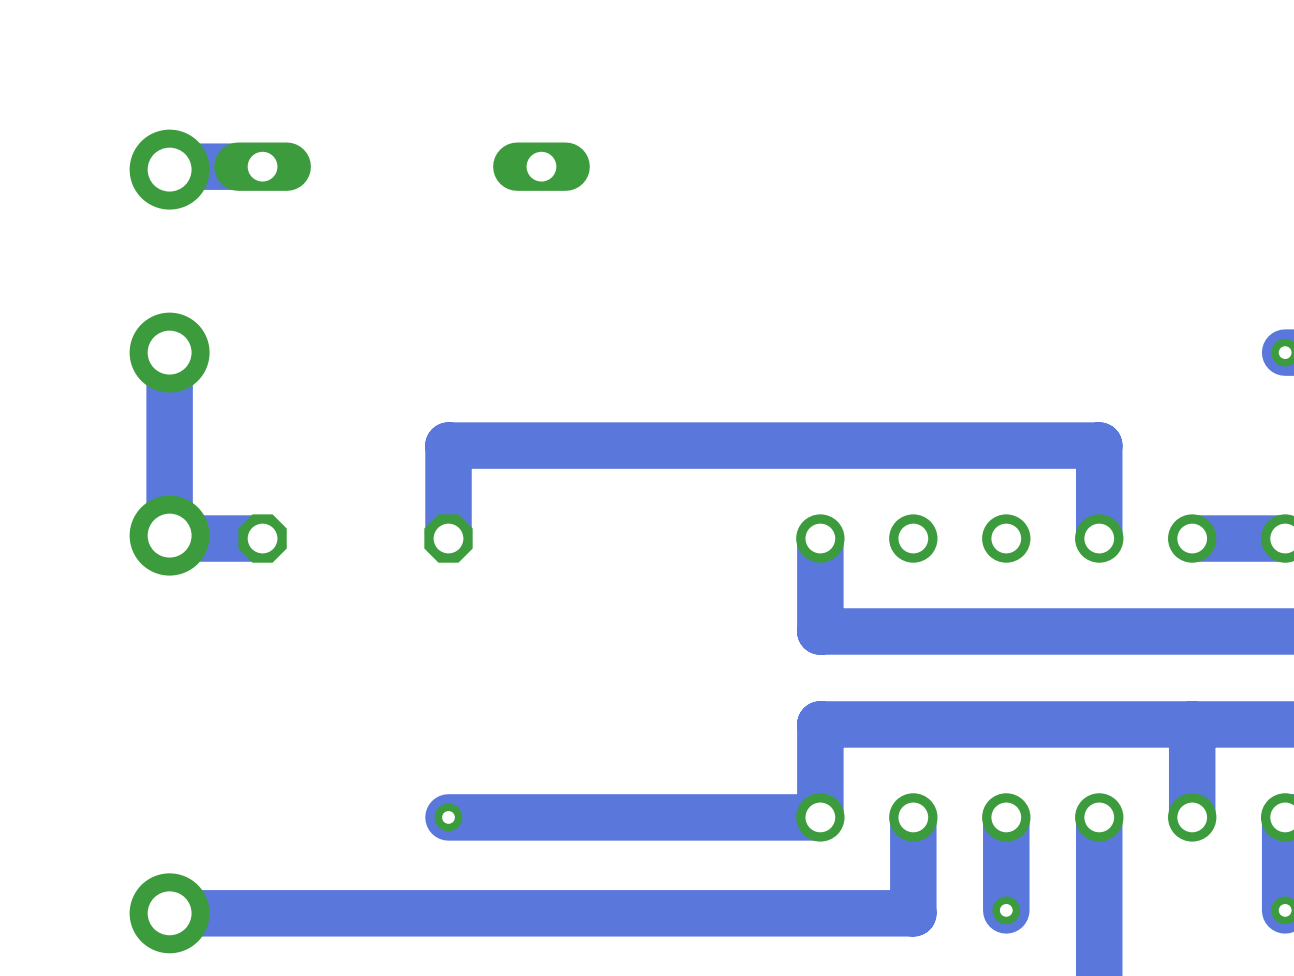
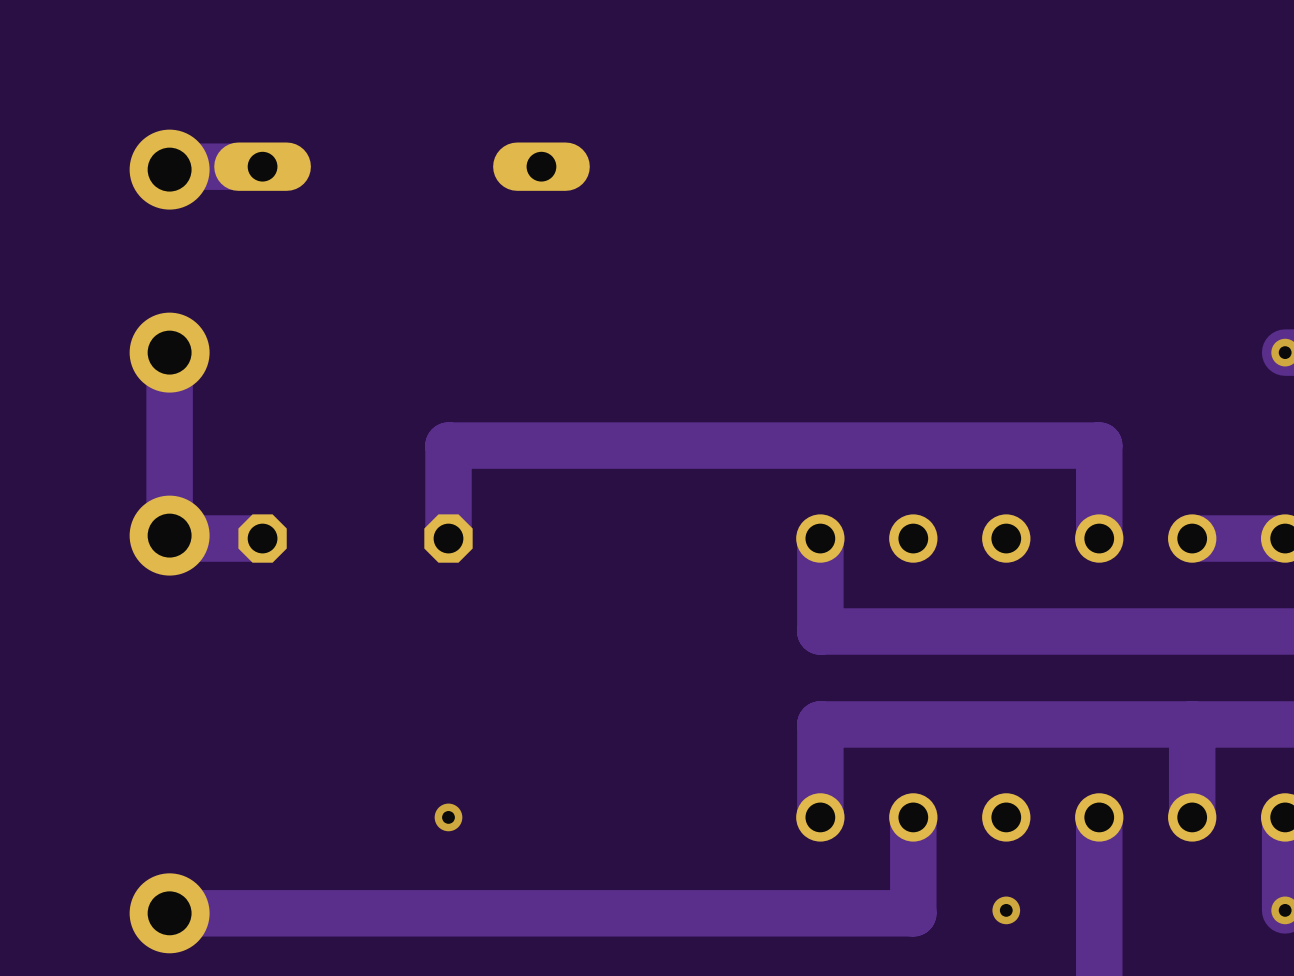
track: (820, 817) (448, 817) -> none
track: (1006, 817) (1006, 910) -> none

